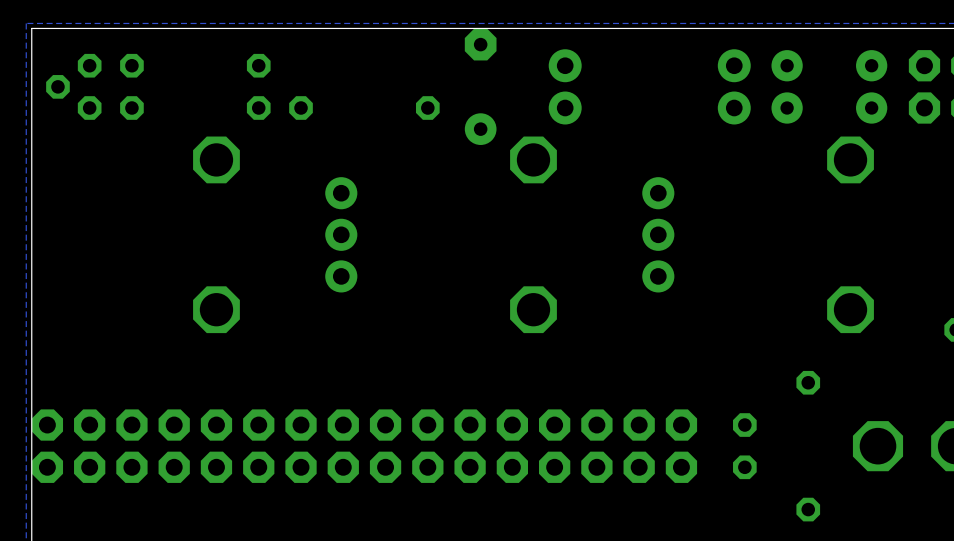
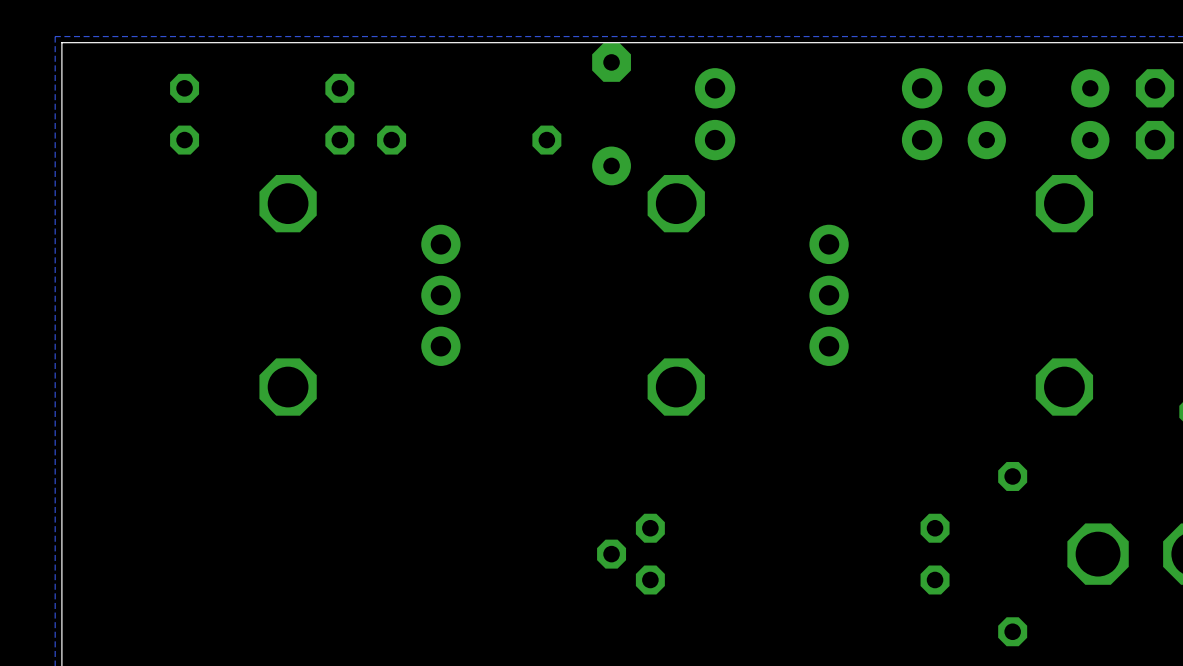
part: (73, 86) -> none
part: (195, 446) -> none
part: none -> (630, 554)
part: (533, 446) -> none

